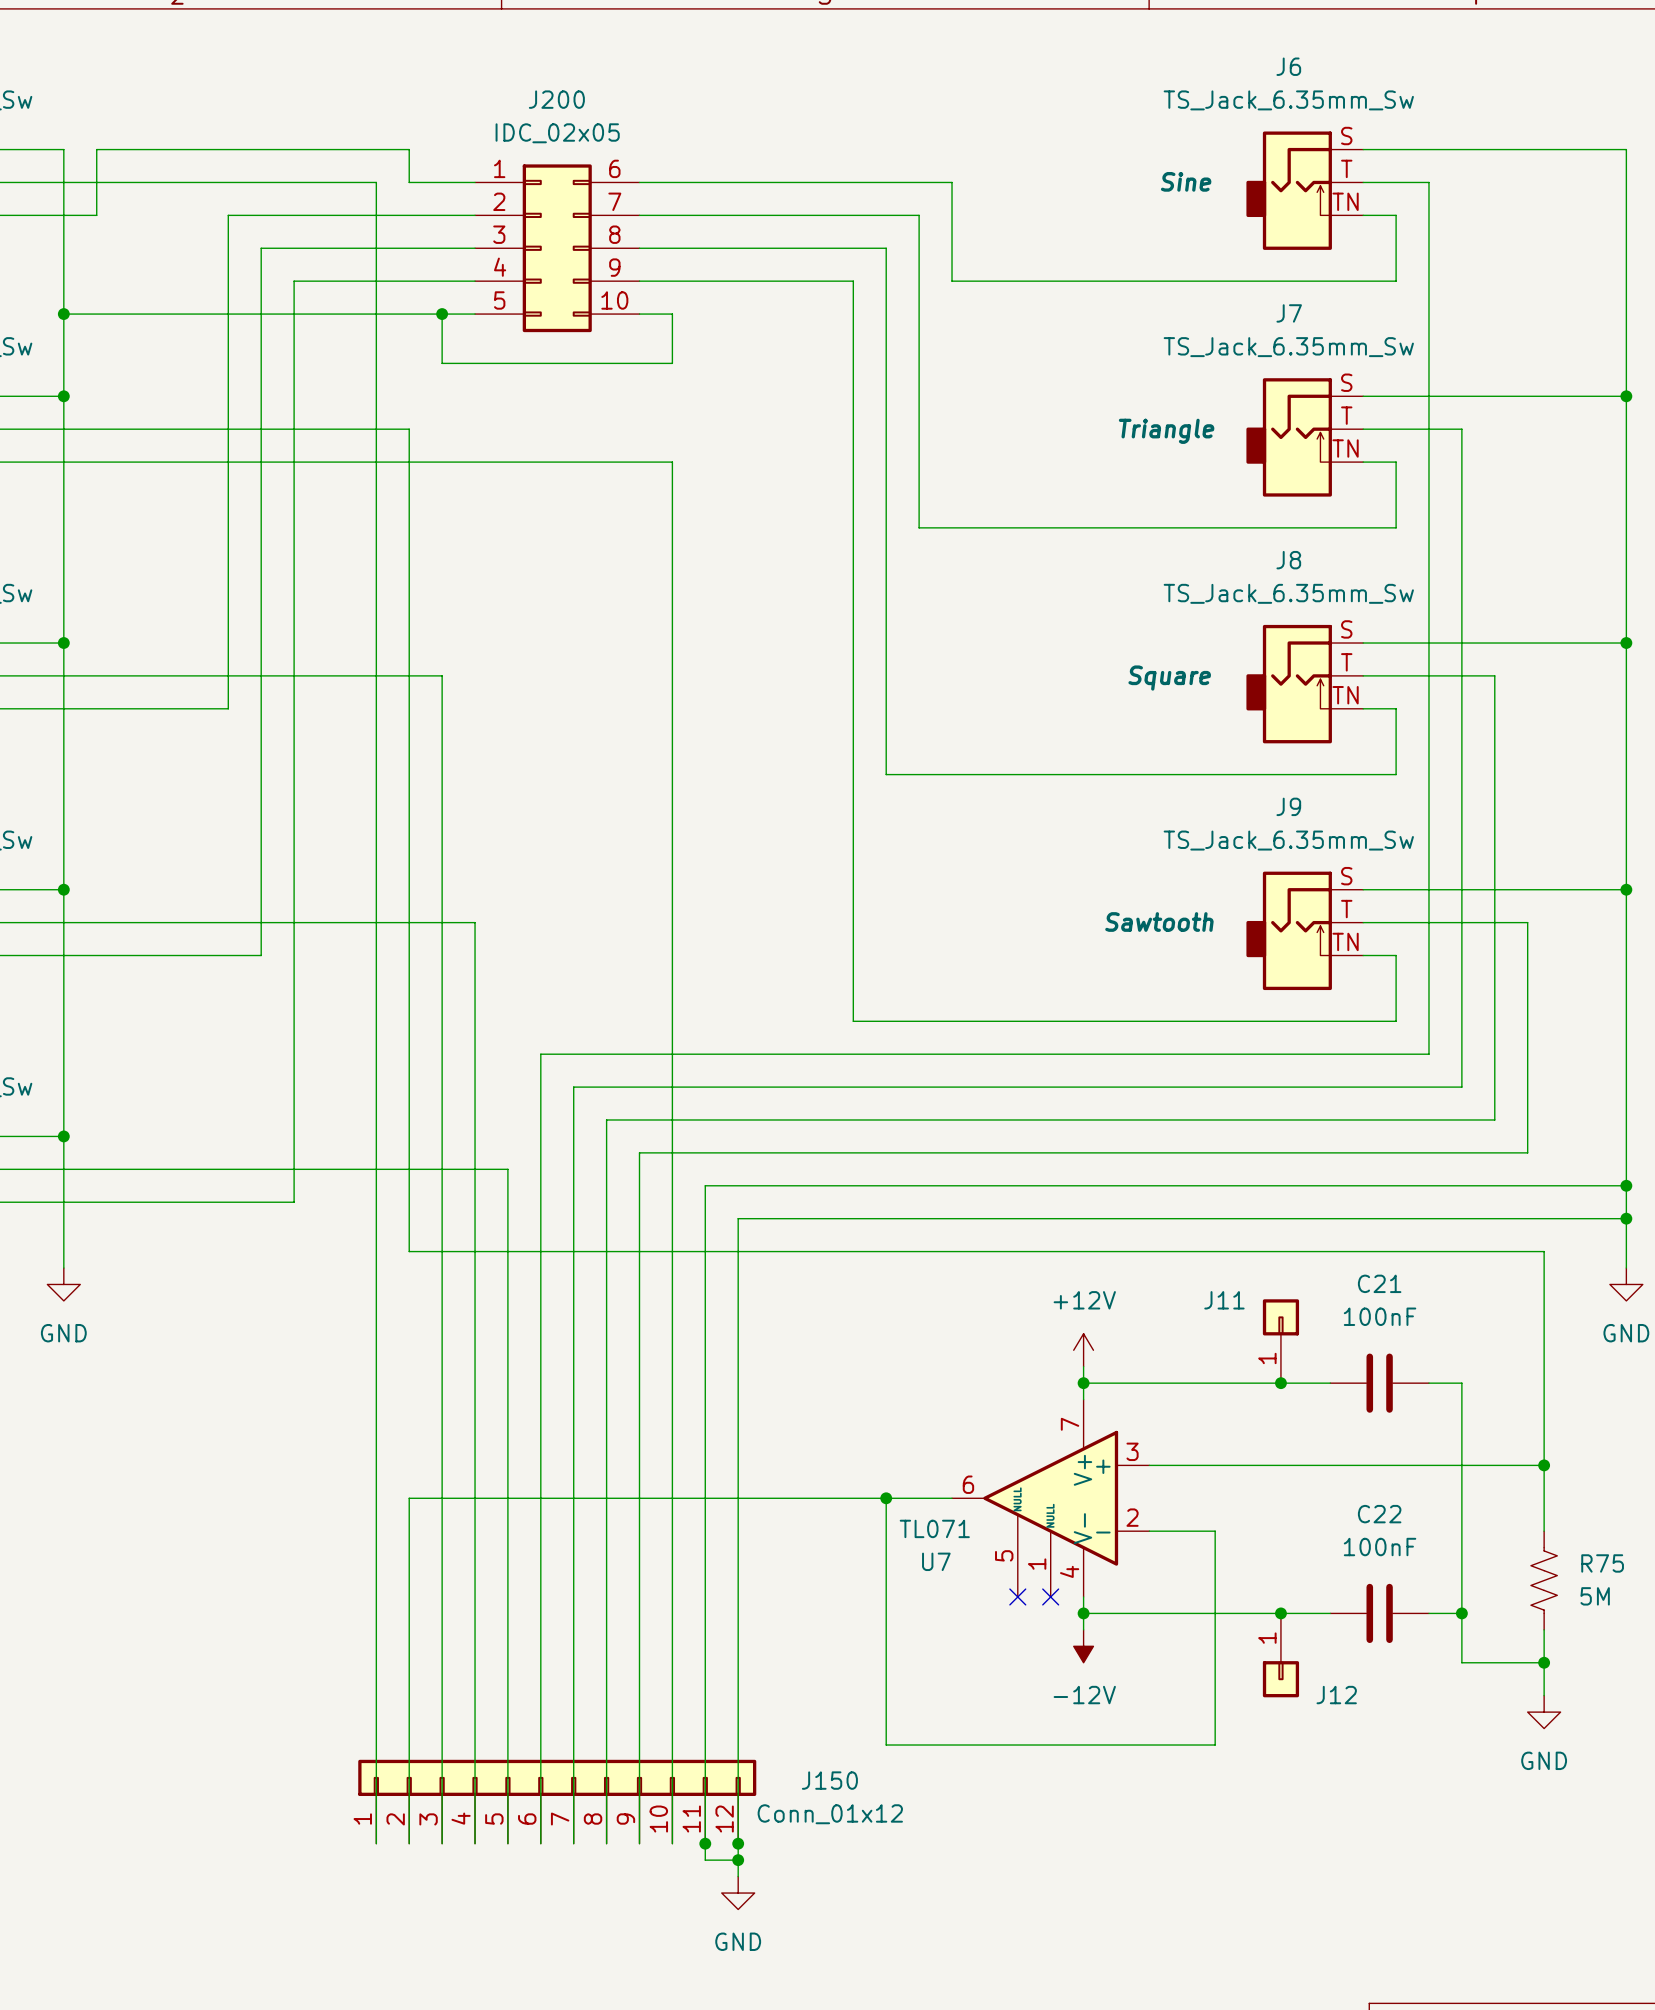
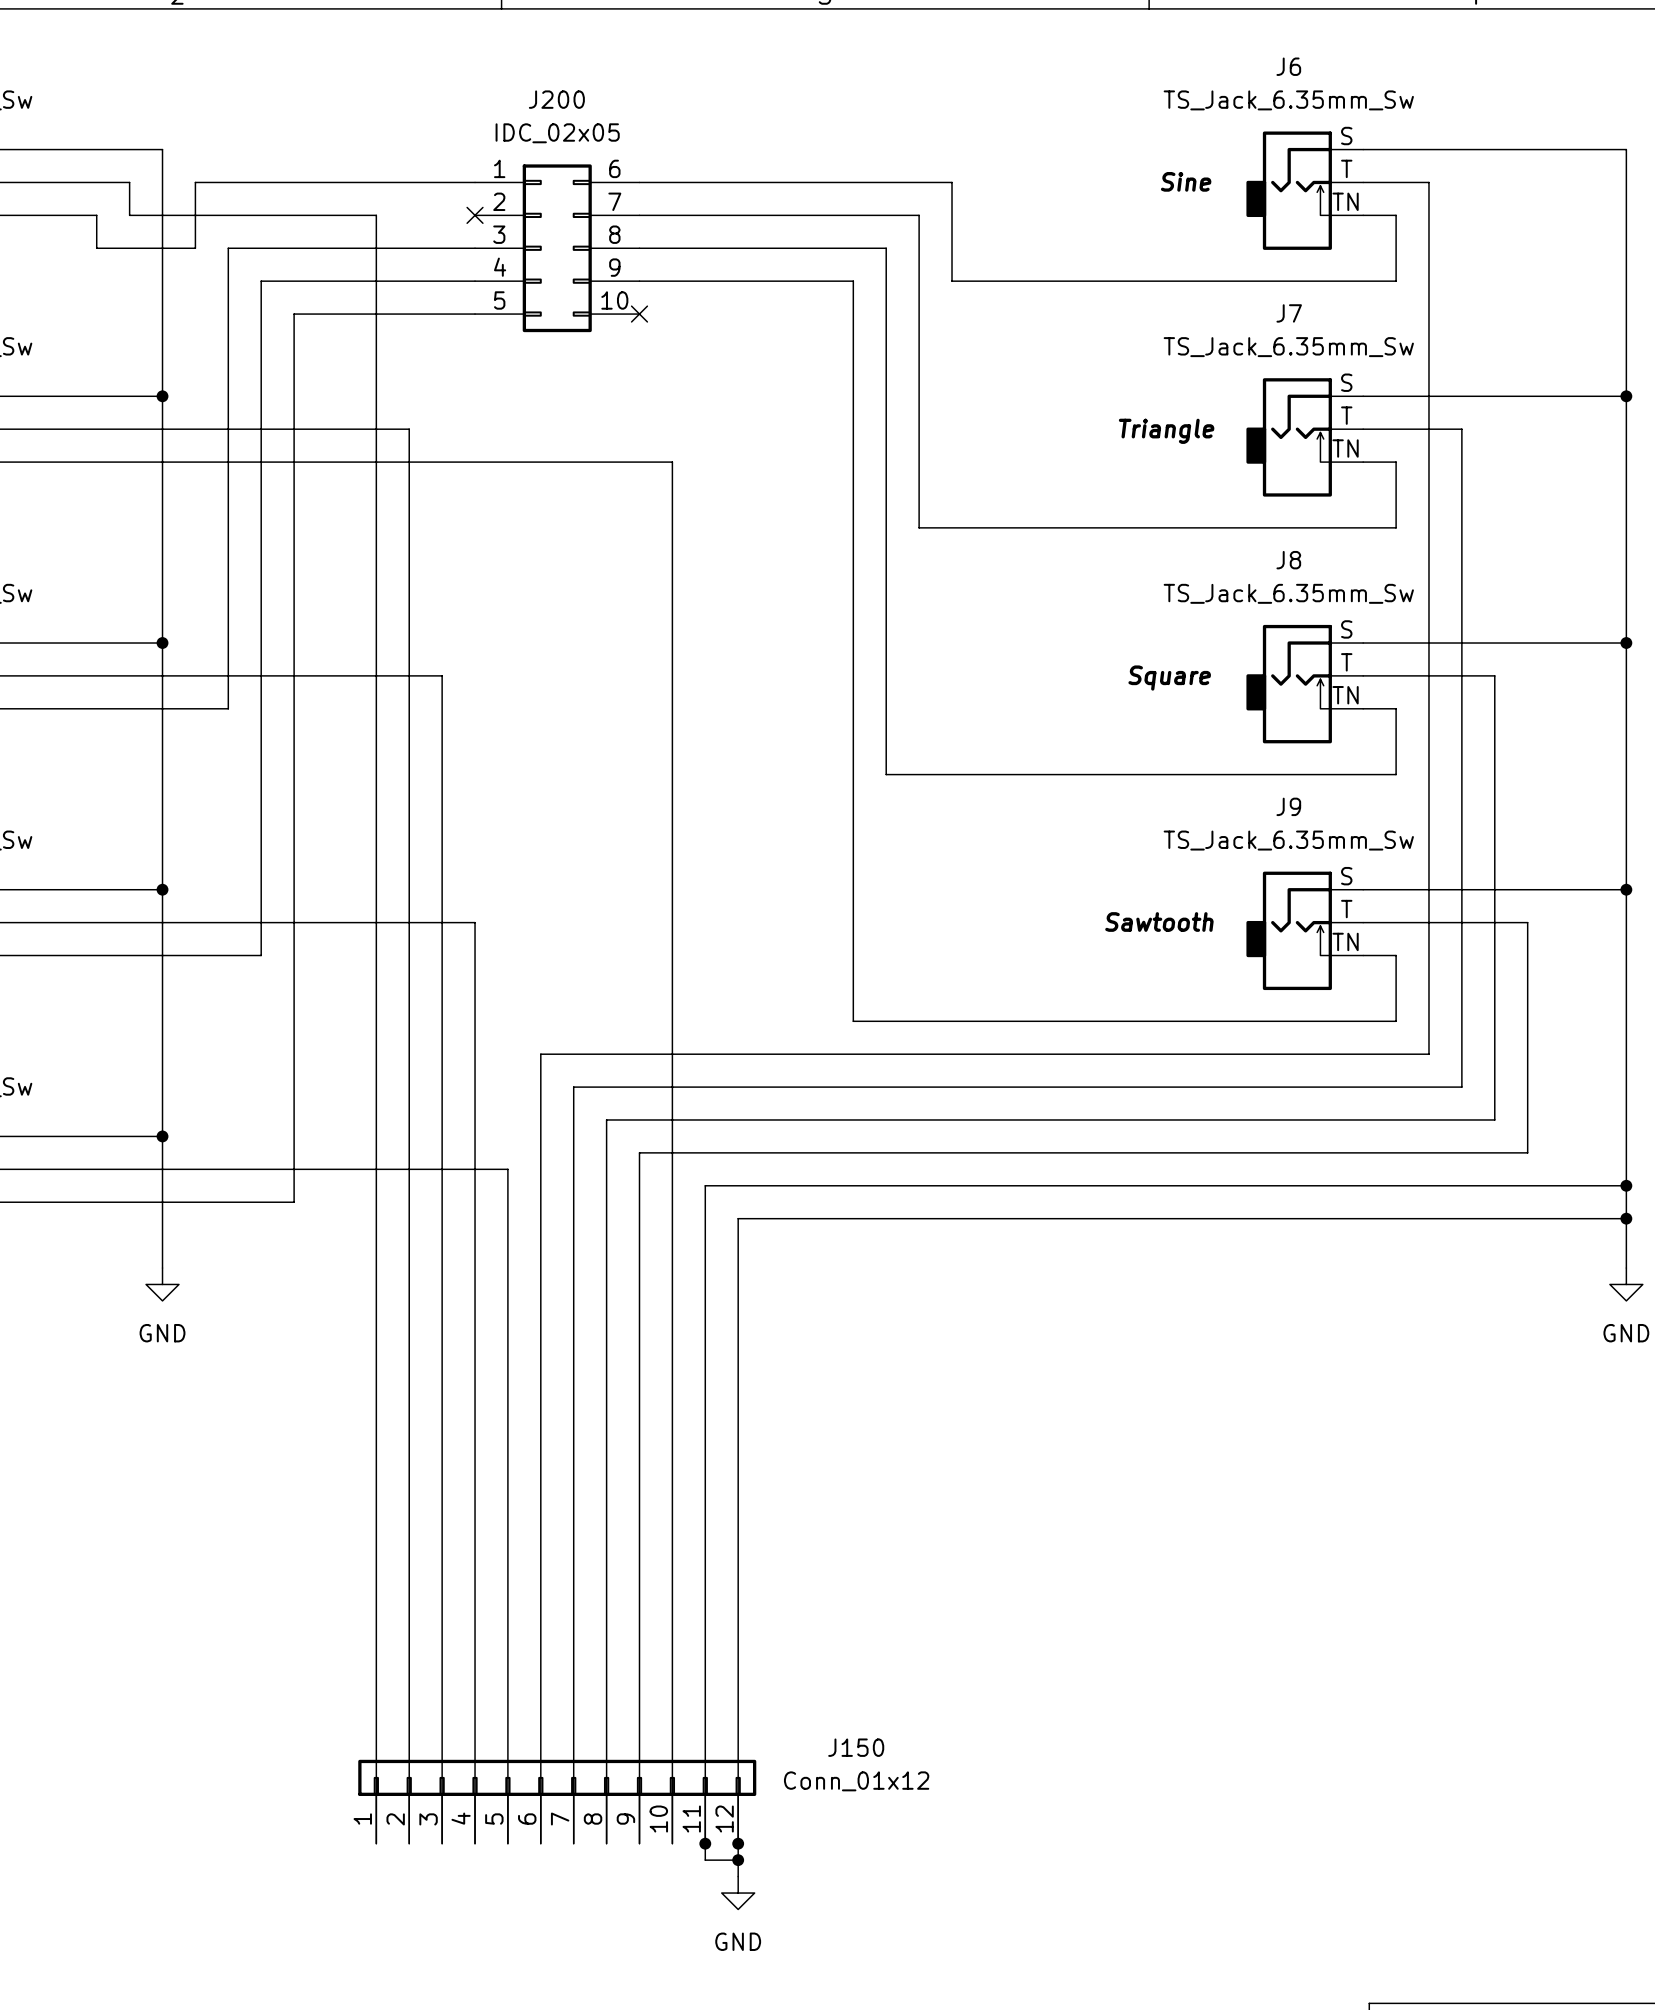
wire: (63, 149) (63, 1268) -> none
wire: (96, 149) (96, 215) -> (96, 149) (63, 149)
wire: (162, 149) (409, 149) (409, 182) -> (162, 149) (162, 1268)
wire: (129, 182) (195, 182) -> (129, 182) (129, 215) (228, 215)
wire: none -> (195, 182) (195, 248) (96, 248) (96, 215)
wire: (376, 182) (376, 215) (475, 215) -> (376, 182) (409, 182)
wire: (228, 215) (228, 248) -> (261, 248) (228, 248)
no-connect mark: none -> (475, 215)
wire: (261, 248) (261, 281) -> (294, 281) (261, 281)
wire: (294, 281) (294, 314) (63, 314) -> none
junction: (63, 314) -> none
wire: (442, 314) (442, 363) (672, 363) (672, 314) (639, 314) -> none
junction: (442, 314) -> none
no-connect mark: none -> (639, 314)
wire: none -> (63, 396) (162, 396)
junction: (63, 396) -> none
junction: none -> (162, 396)
wire: none -> (63, 643) (162, 643)
junction: (63, 643) -> none
junction: none -> (162, 643)
wire: none -> (63, 889) (162, 889)
junction: (63, 889) -> none
junction: none -> (162, 889)
wire: none -> (63, 1136) (162, 1136)
junction: (63, 1136) -> none
junction: none -> (162, 1136)
wire: (409, 1251) (1544, 1251) (1544, 1531) -> none
power symbol position: GND (63, 1284) -> GND (162, 1284)
J11: (1280, 1341) -> none
power symbol: +12V (1083, 1350) -> none
wire: (1083, 1366) (1083, 1399) -> none
wire: (1083, 1383) (1330, 1383) -> none
junction: (1083, 1383) -> none
junction: (1280, 1383) -> none
C21: 100nF (1379, 1383) -> none
wire: (1428, 1383) (1461, 1383) (1461, 1662) (1544, 1662) -> none
wire: (1149, 1465) (1544, 1465) -> none
junction: (1544, 1465) -> none
wire: (409, 1498) (952, 1498) -> (409, 1498) (409, 1251)
wire: (886, 1498) (886, 1745) (1215, 1745) (1215, 1531) (1149, 1531) -> none
junction: (886, 1498) -> none
U7: TL071 (1050, 1498) -> none
R75: 5M (1544, 1580) -> none
no-connect mark: (1017, 1596) -> none
no-connect mark: (1050, 1596) -> none
wire: (1083, 1596) (1083, 1629) -> none
wire: (1083, 1613) (1330, 1613) -> none
junction: (1083, 1613) -> none
junction: (1280, 1613) -> none
C22: 100nF (1379, 1613) -> none
wire: (1428, 1613) (1461, 1613) -> none
junction: (1461, 1613) -> none
wire: (1544, 1629) (1544, 1695) -> none
power symbol: -12V (1083, 1646) -> none
J12: (1280, 1655) -> none
junction: (1544, 1662) -> none
power symbol: GND (1544, 1712) -> none
J150 name position: J150 (829, 1780) -> J150 (856, 1747)
J150 value position: Conn_01x12 (830, 1814) -> Conn_01x12 (856, 1781)

